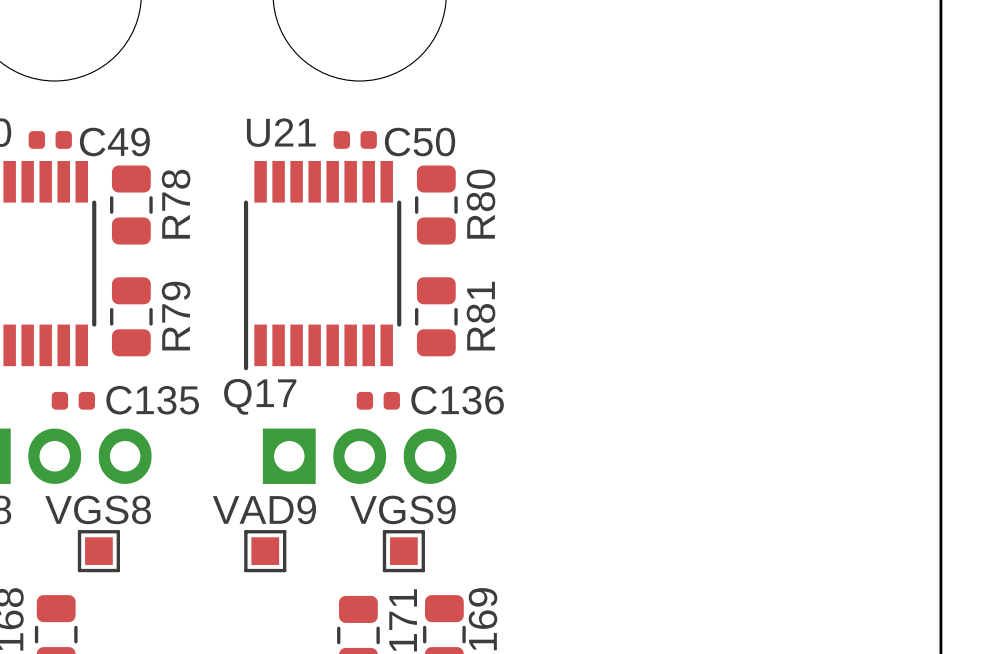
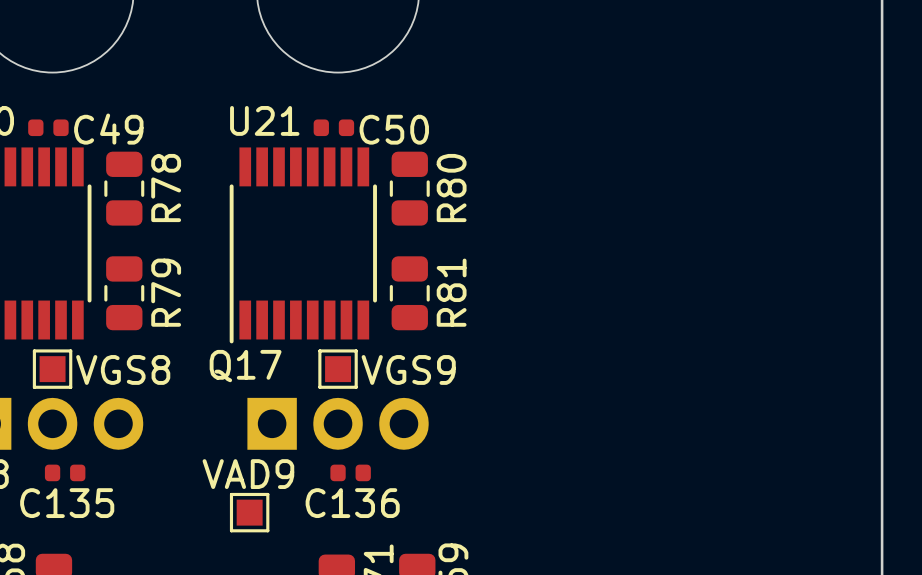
C135 position: (73, 400) -> (65, 472)
C135 name position: C135 (152, 400) -> C135 (67, 503)
C136 position: (378, 400) -> (350, 472)
C136 name position: C136 (457, 400) -> C136 (352, 503)
VGS8 name position: VGS8 (98, 509) -> VGS8 (123, 369)
VGS9 name position: VGS9 (403, 509) -> VGS9 (408, 369)
VGS8 position: (98, 551) -> (52, 369)
VGS9 position: (403, 551) -> (338, 369)

